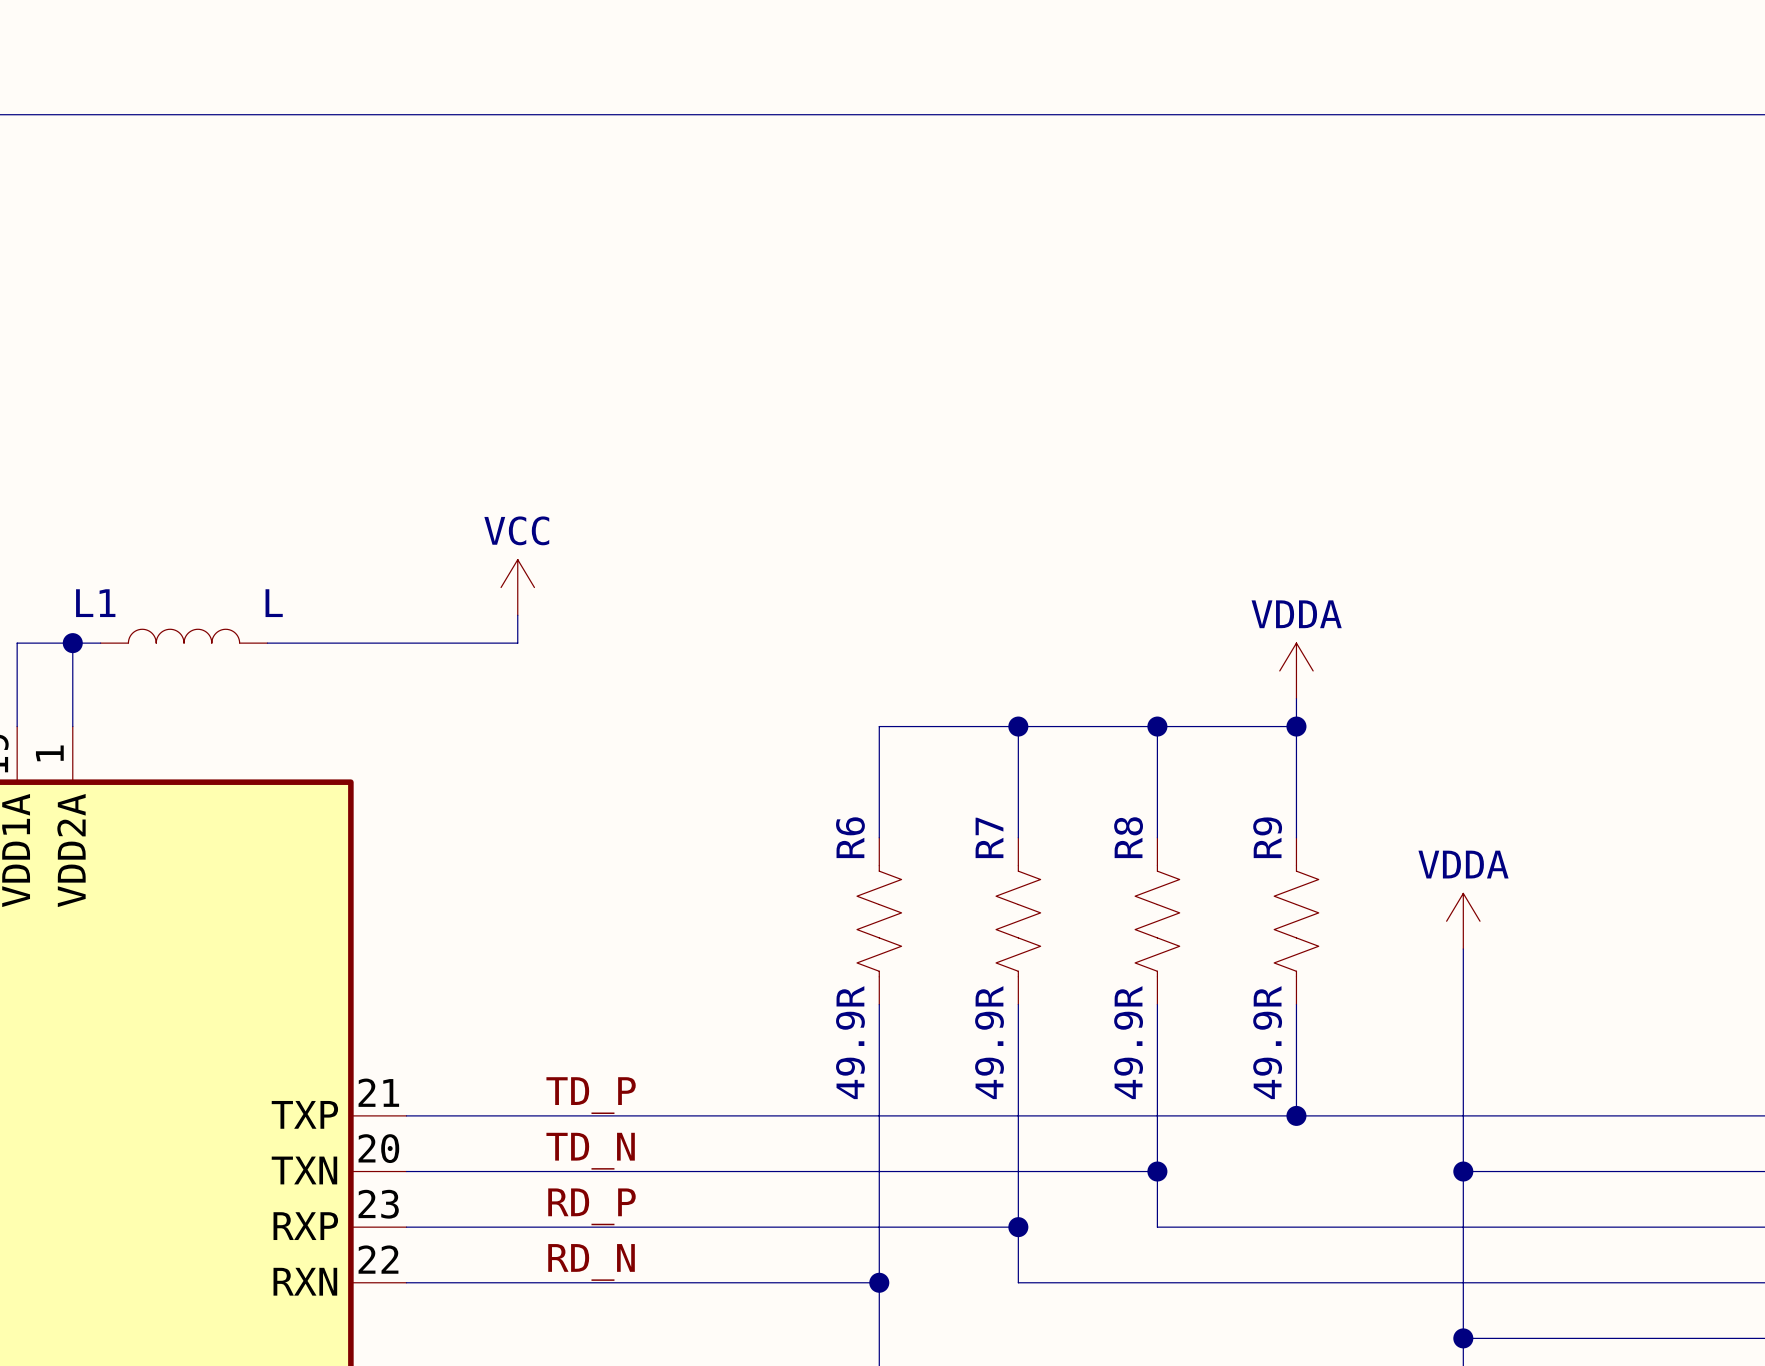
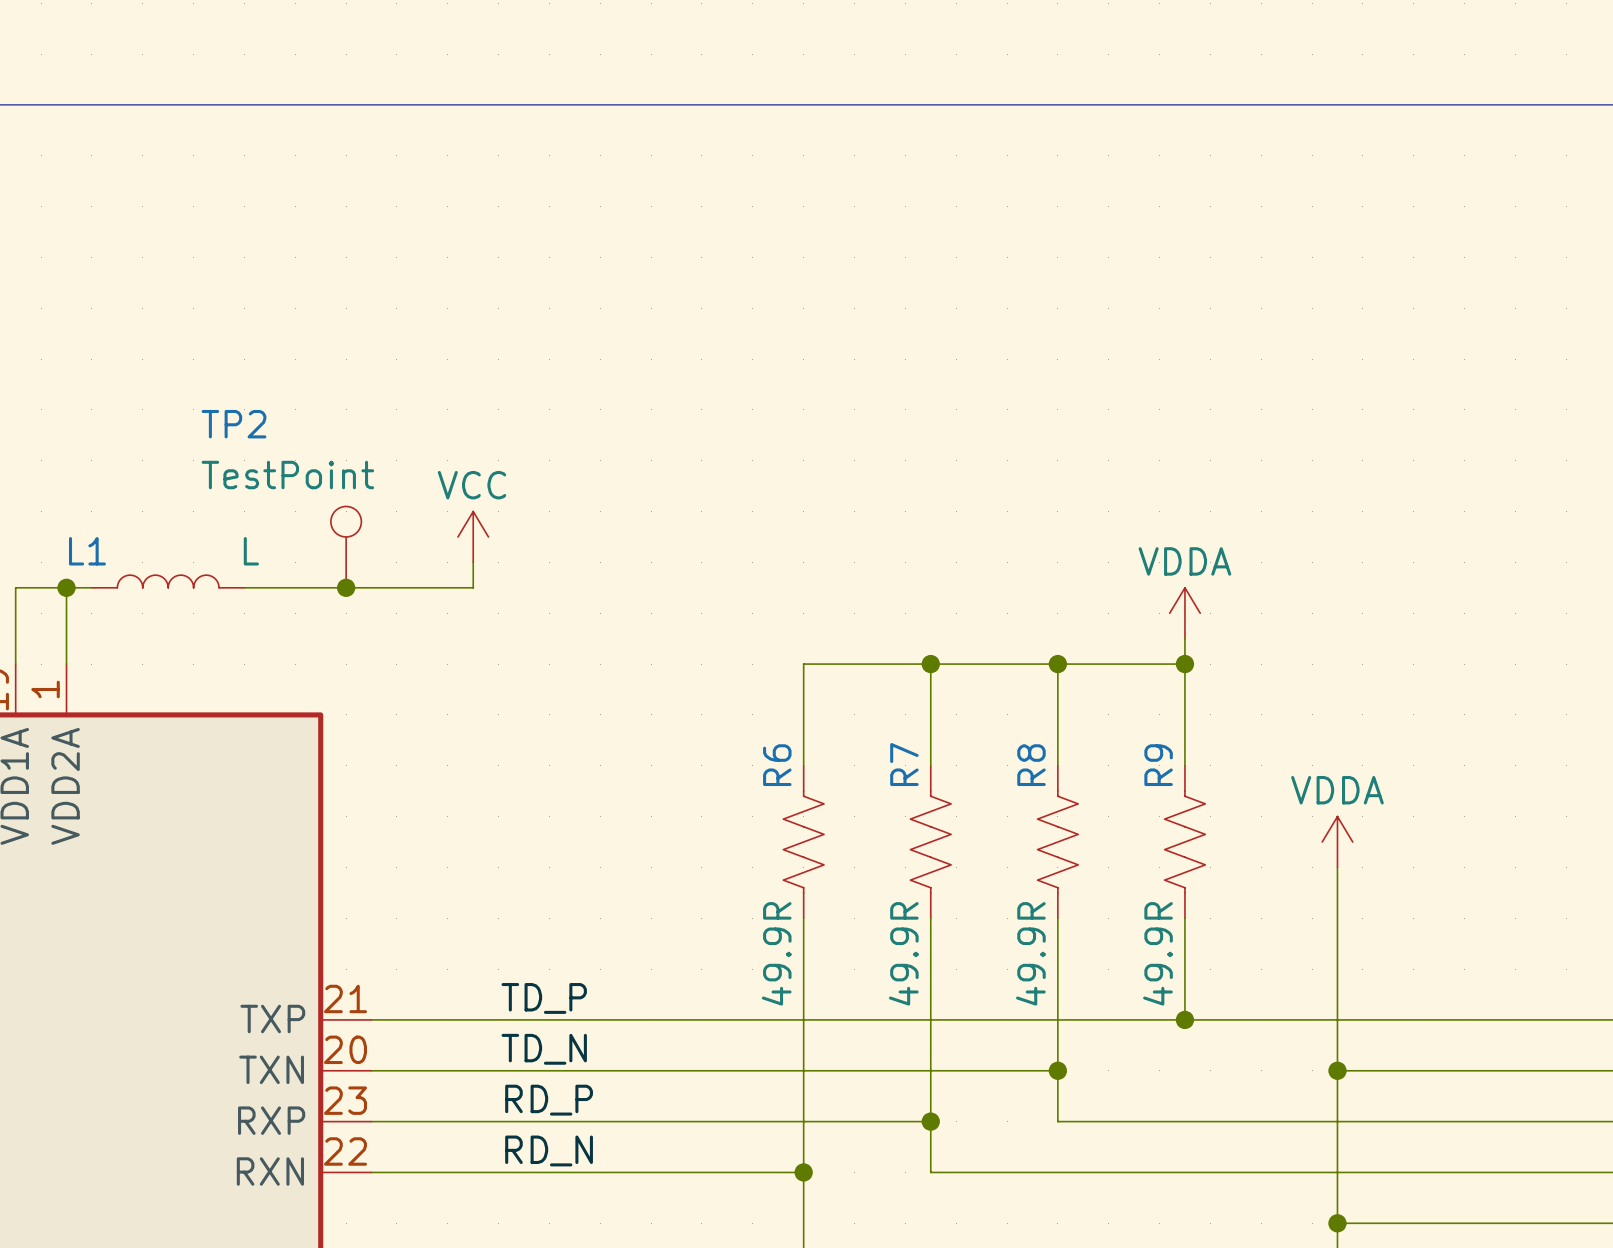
TP2: none -> TestPoint (346, 547)
junction: none -> (346, 587)

